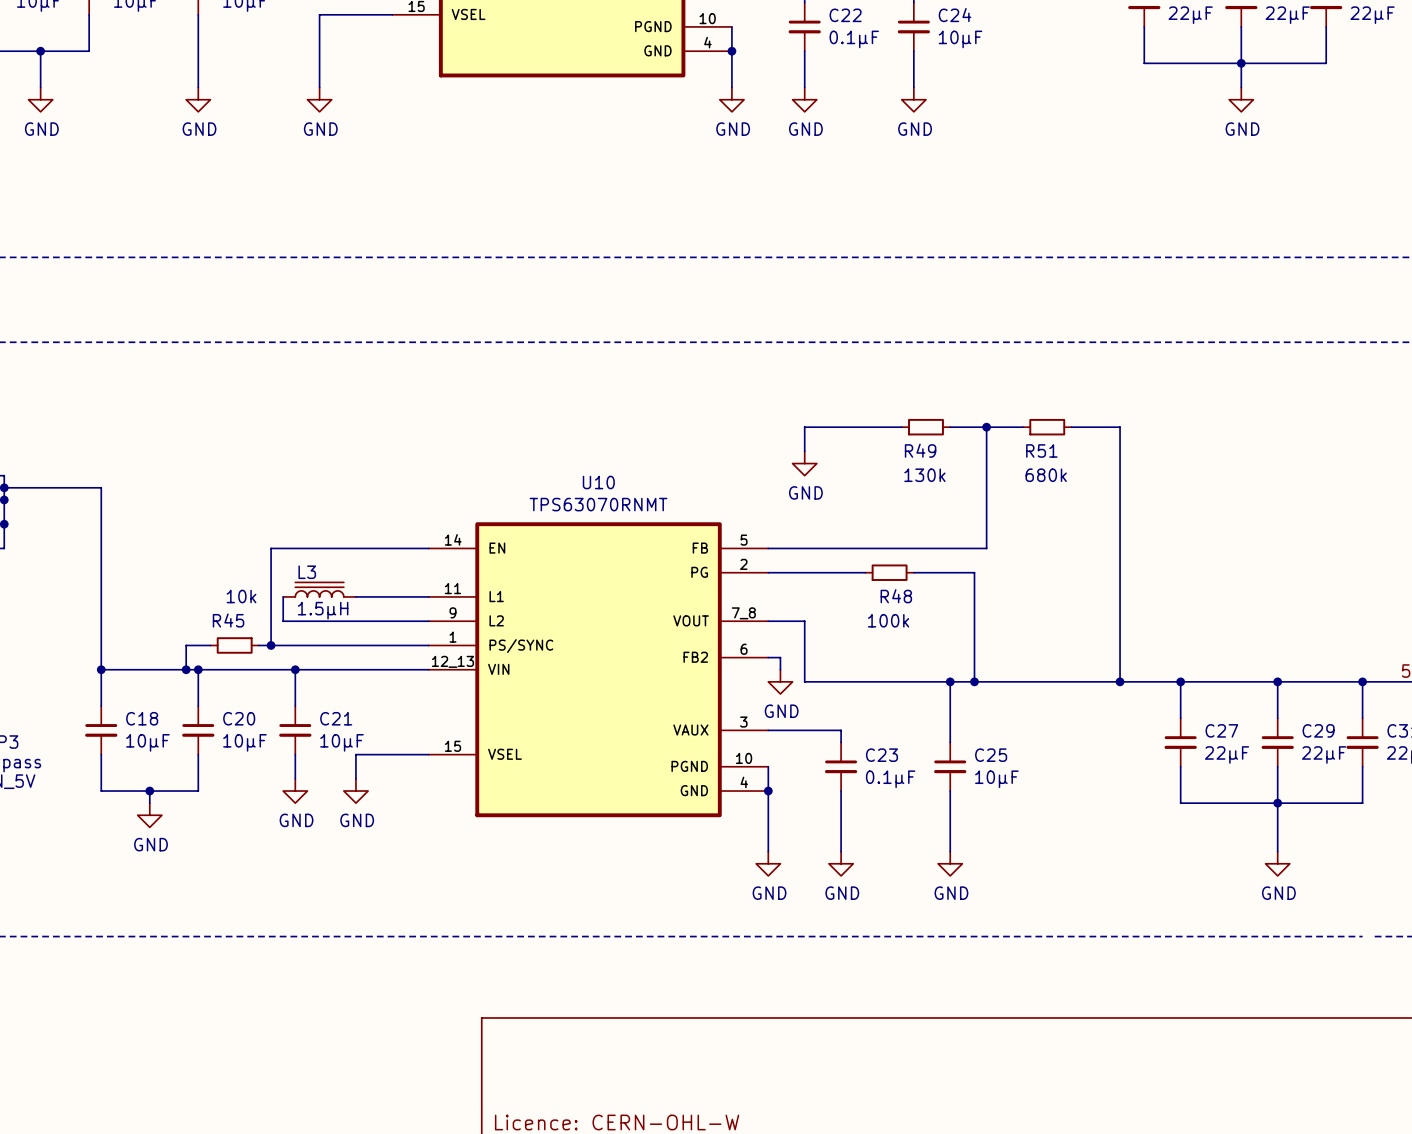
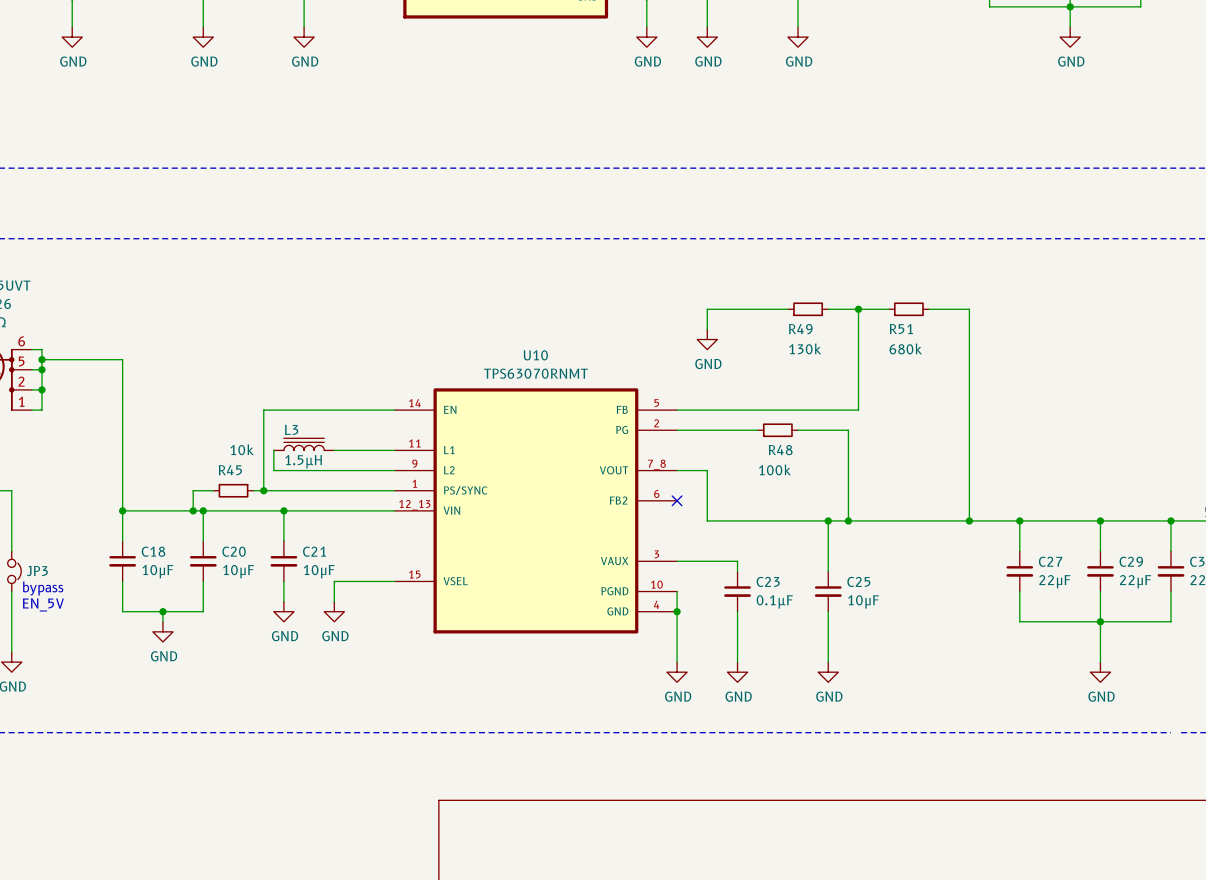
wire: (768, 657) (780, 657) (780, 669) -> none
no-connect mark: none -> (677, 500)
power symbol: GND (780, 681) -> none

